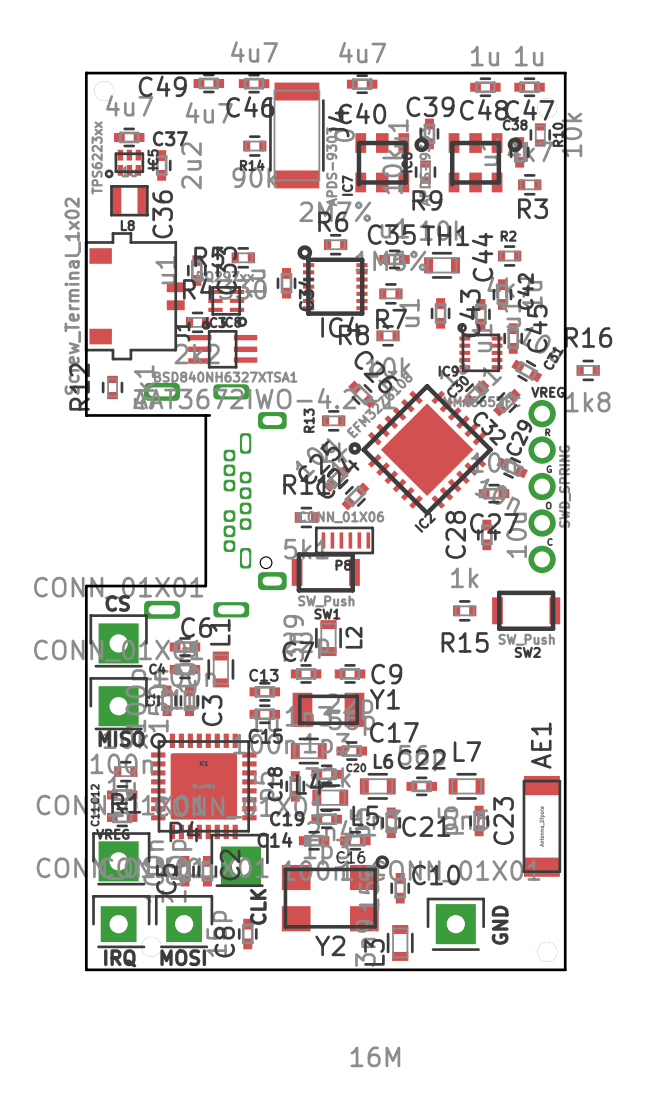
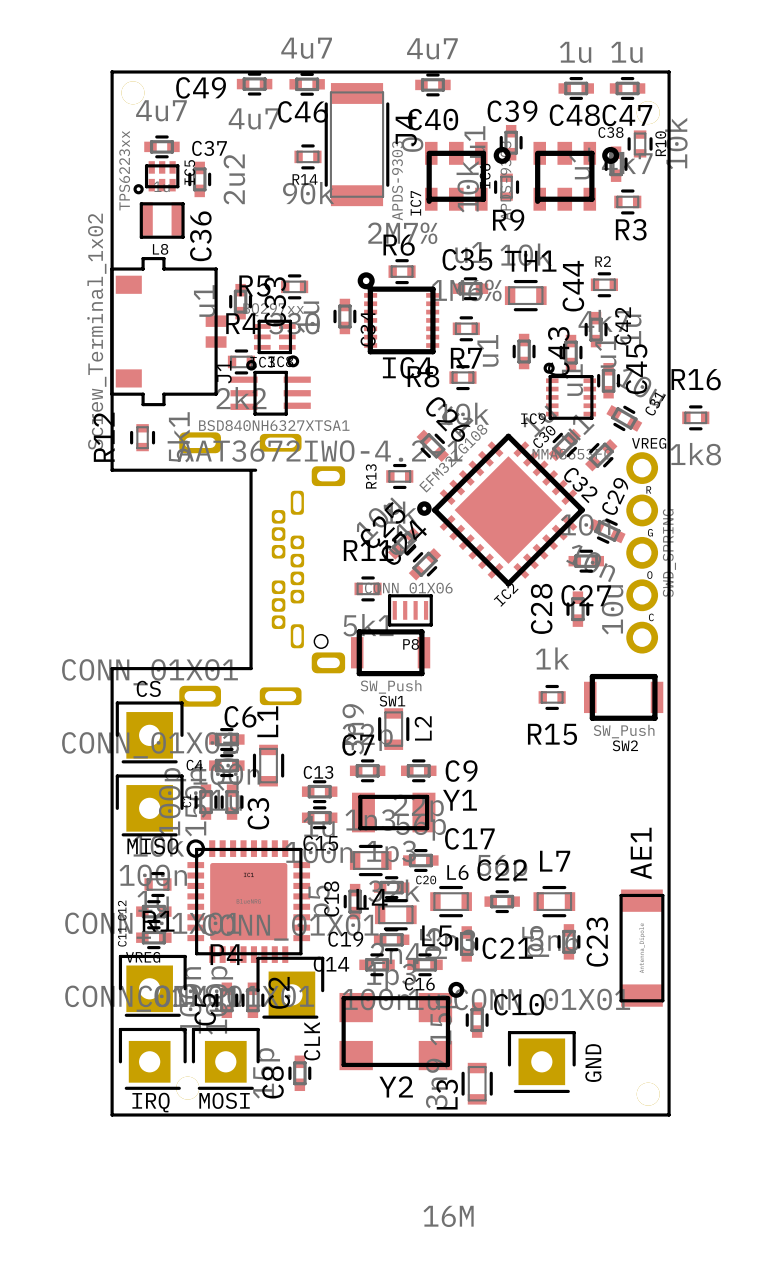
P8 footprint: [314, 526, 375, 555] -> [387, 594, 433, 627]

